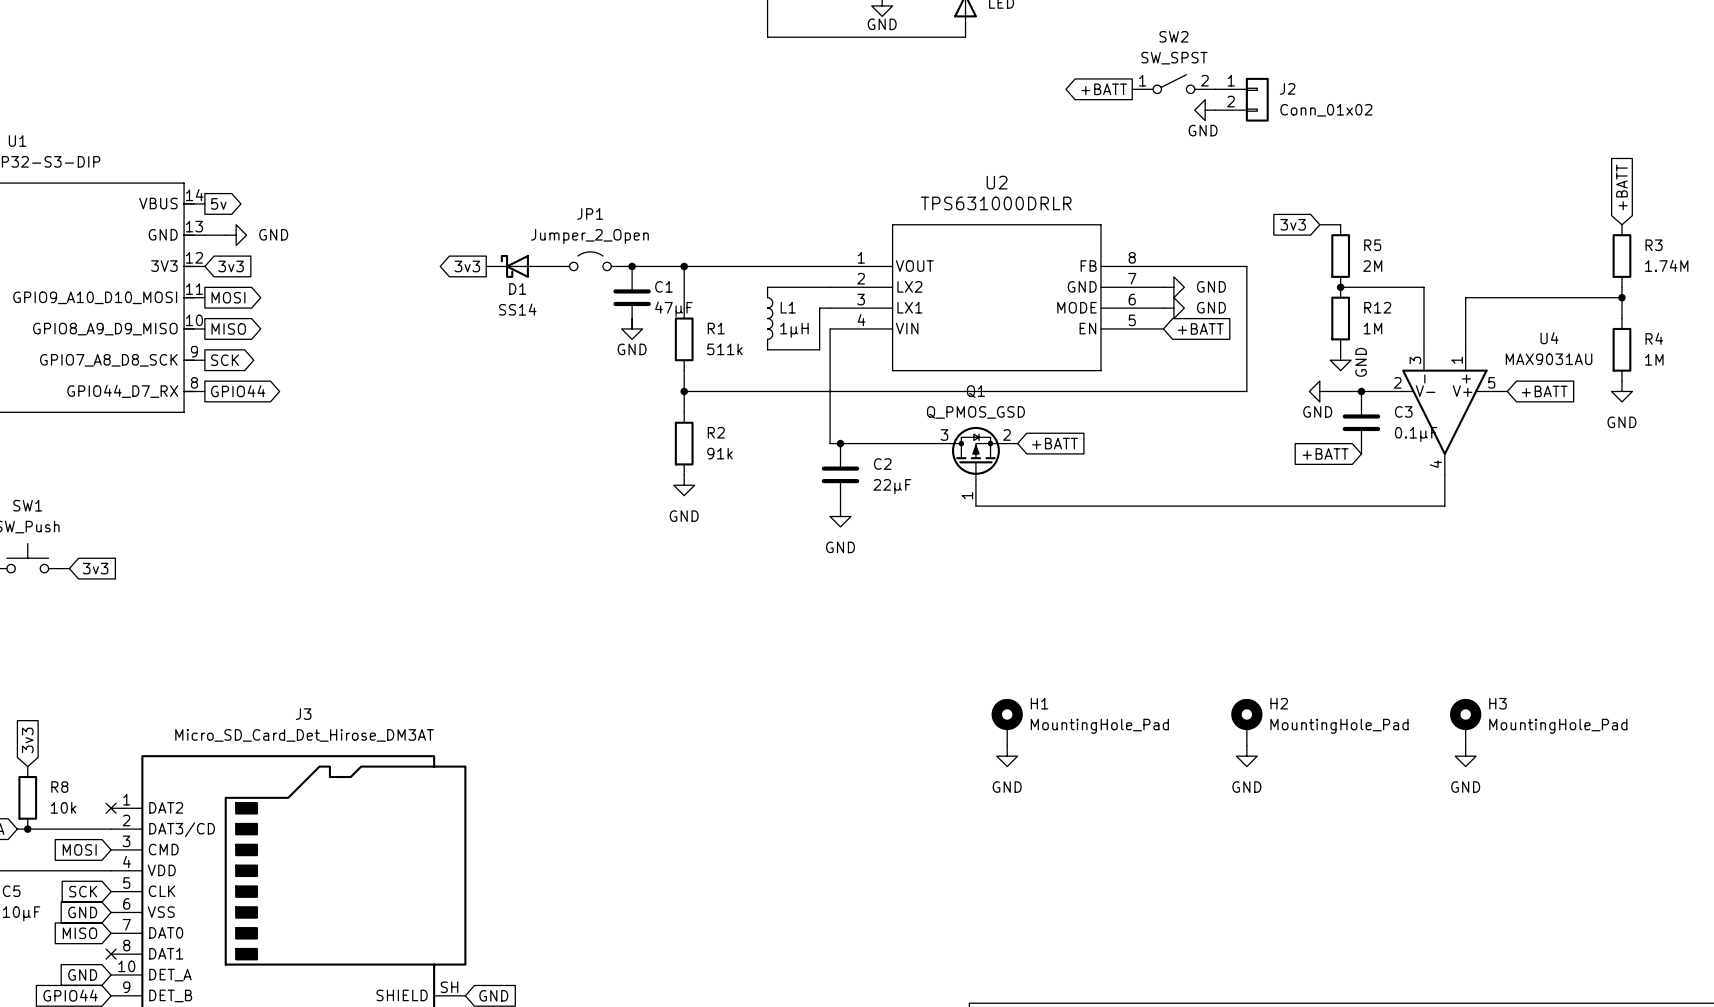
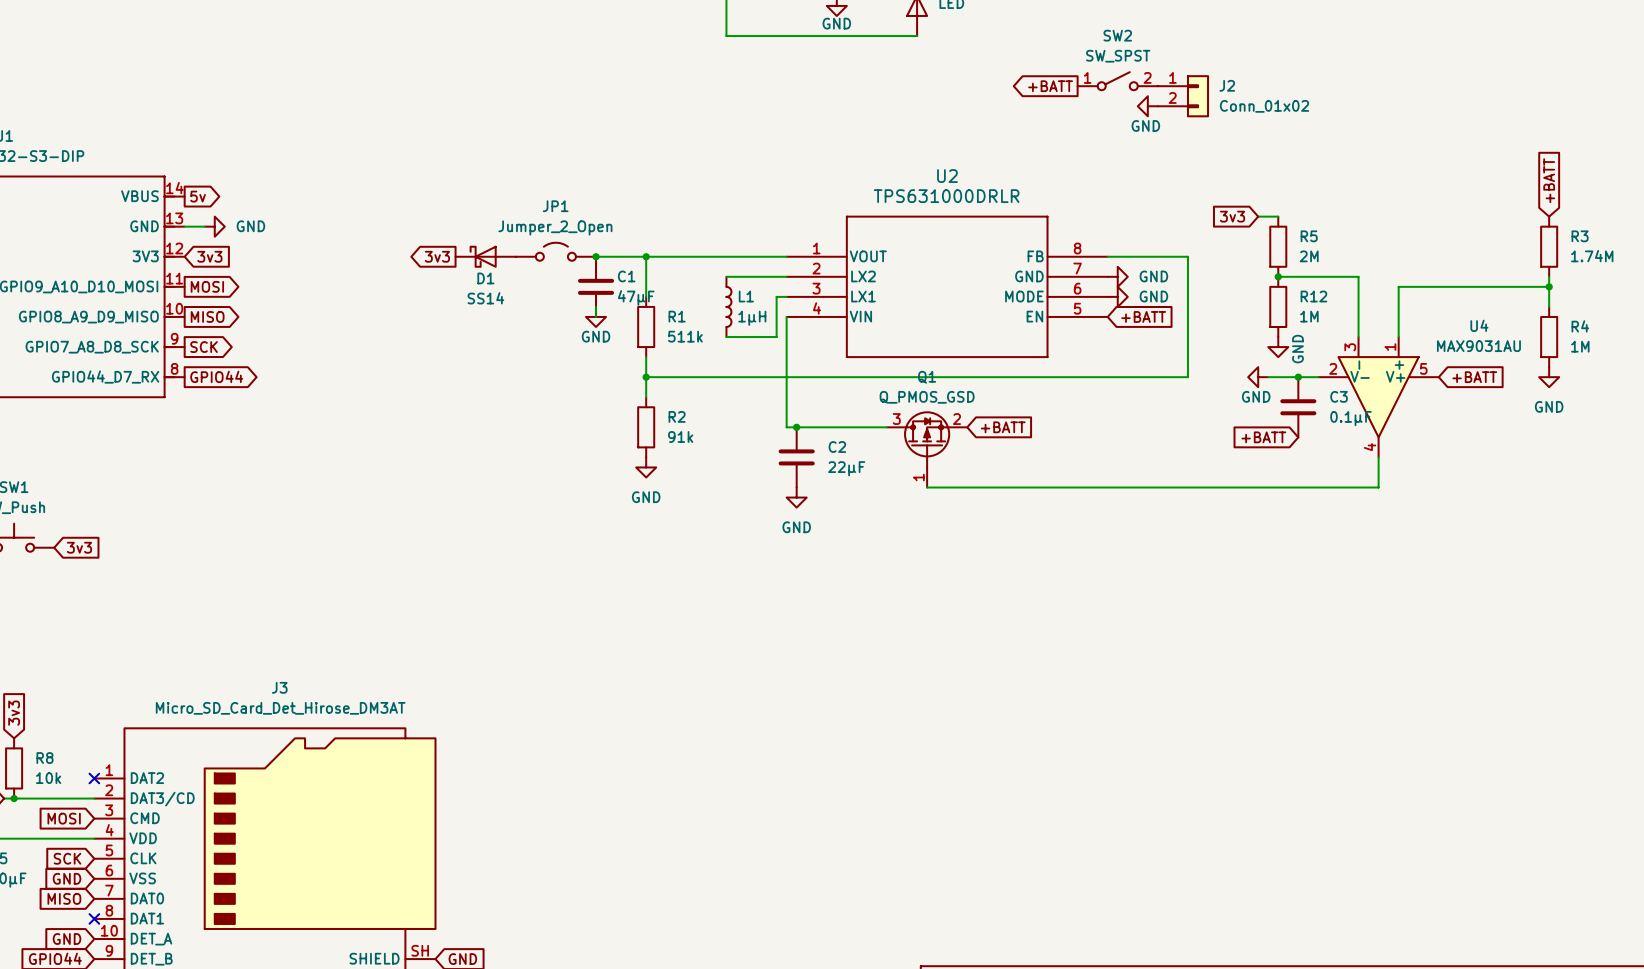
H1: MountingHole_Pad (1007, 722) -> none
H2: MountingHole_Pad (1246, 722) -> none
H3: MountingHole_Pad (1465, 722) -> none
power symbol: GND (1007, 756) -> none
power symbol: GND (1246, 756) -> none
power symbol: GND (1465, 756) -> none

